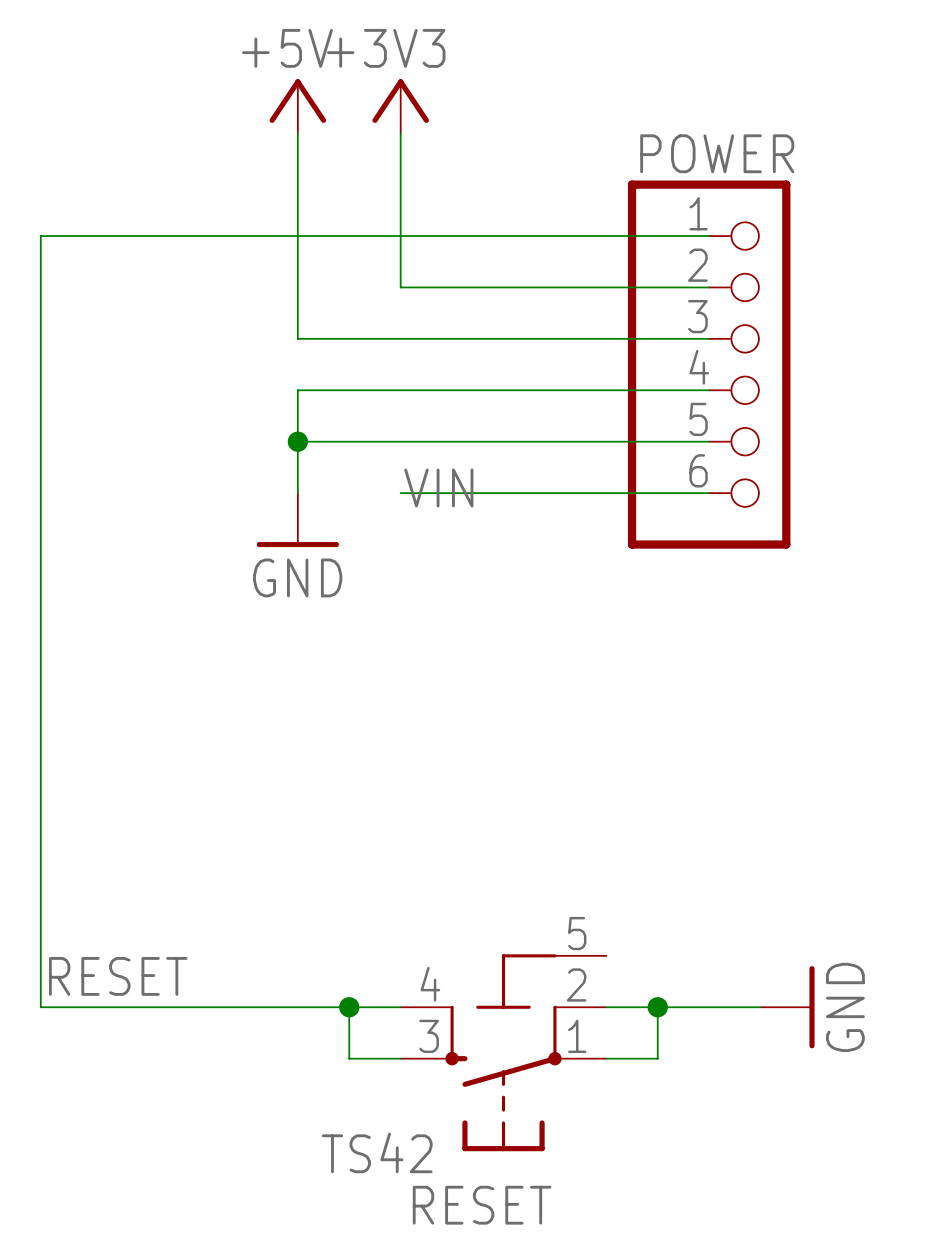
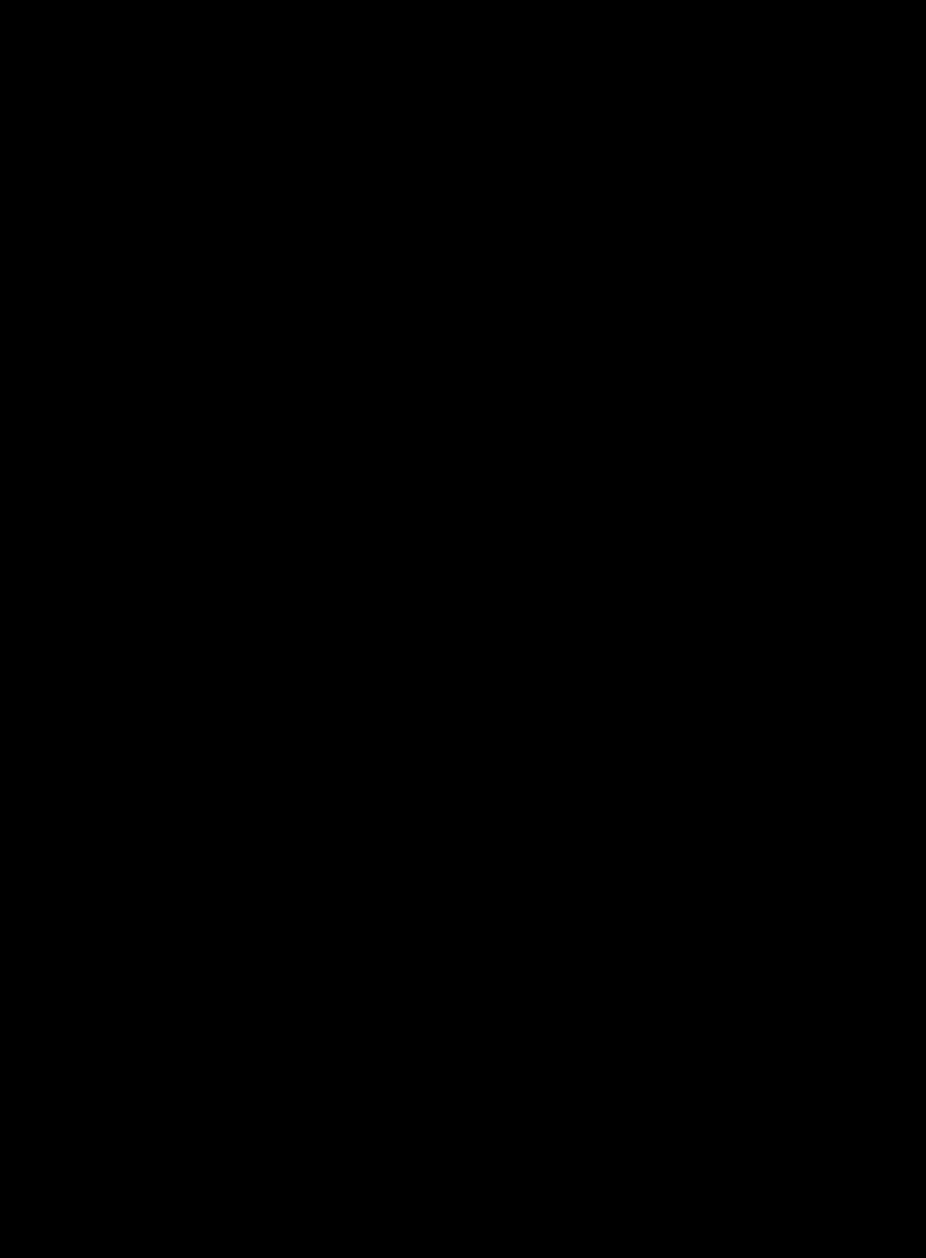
power symbol: +5V (297, 106) -> none
power symbol: +3V3 (400, 106) -> none
wire: (297, 133) (297, 338) (709, 338) -> none
wire: (400, 133) (400, 287) (709, 287) -> none
wire: (709, 236) (40, 236) (40, 1007) (400, 1007) -> none
POWER: (709, 364) -> none
wire: (709, 390) (297, 390) (297, 493) -> none
wire: (297, 441) (709, 441) -> none
junction: (297, 441) -> none
label: VIN (438, 487) -> none
wire: (400, 493) (709, 493) -> none
power symbol: GND (297, 520) -> none
label: RESET (118, 976) -> none
wire: (349, 1007) (349, 1058) (400, 1058) -> none
junction: (349, 1007) -> none
wire: (606, 1007) (760, 1007) -> none
wire: (657, 1007) (657, 1058) (606, 1058) -> none
junction: (657, 1007) -> none
power symbol: GND (787, 1007) -> none
RESET: TS42 (503, 1052) -> none

